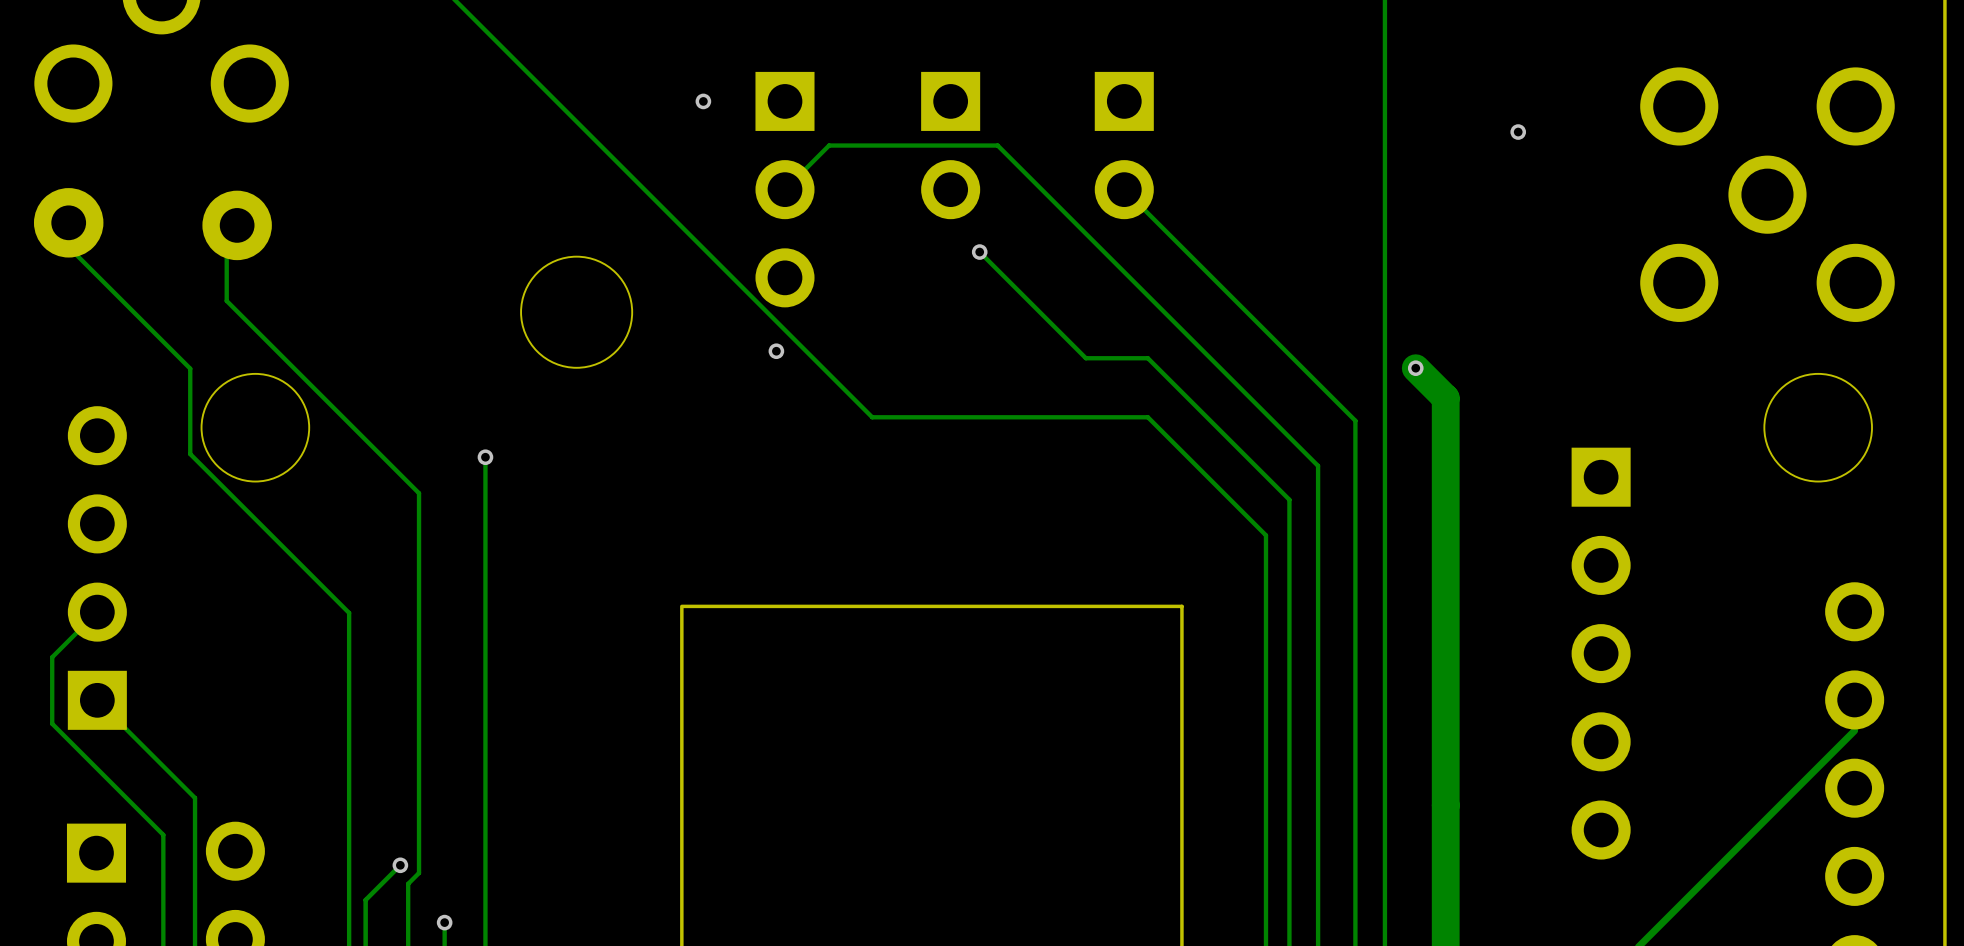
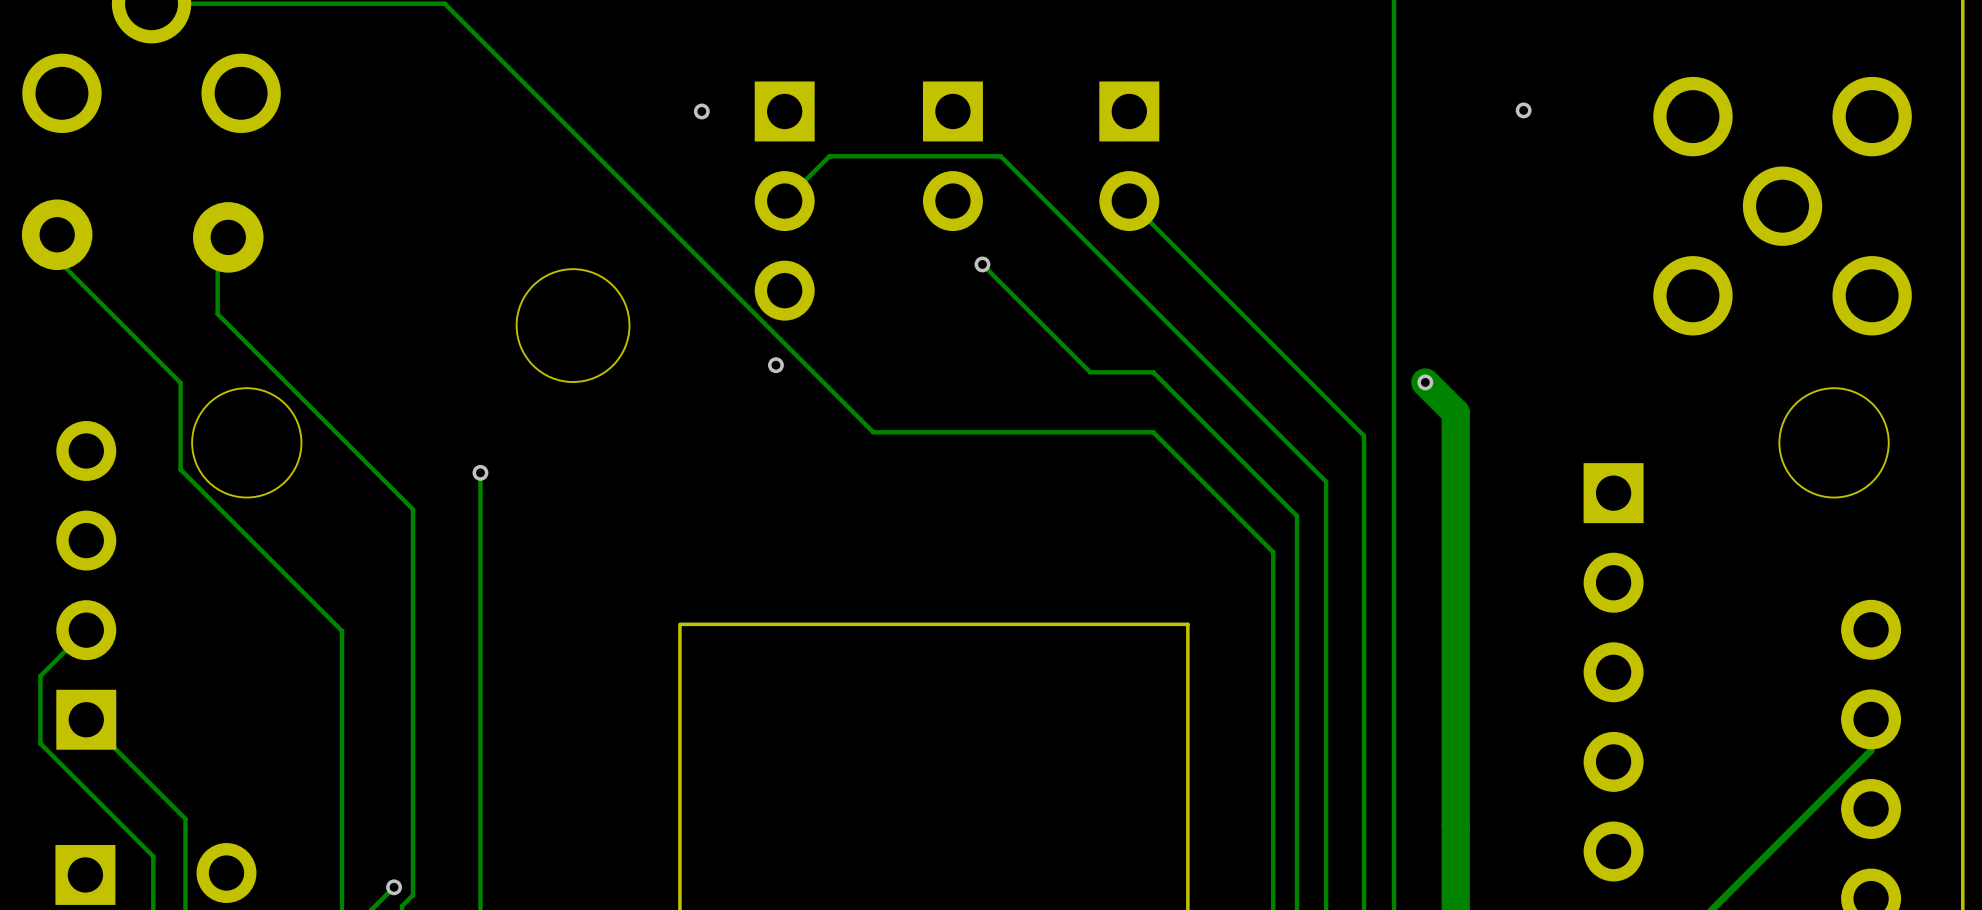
via position: (1518, 132) -> (1523, 110)

